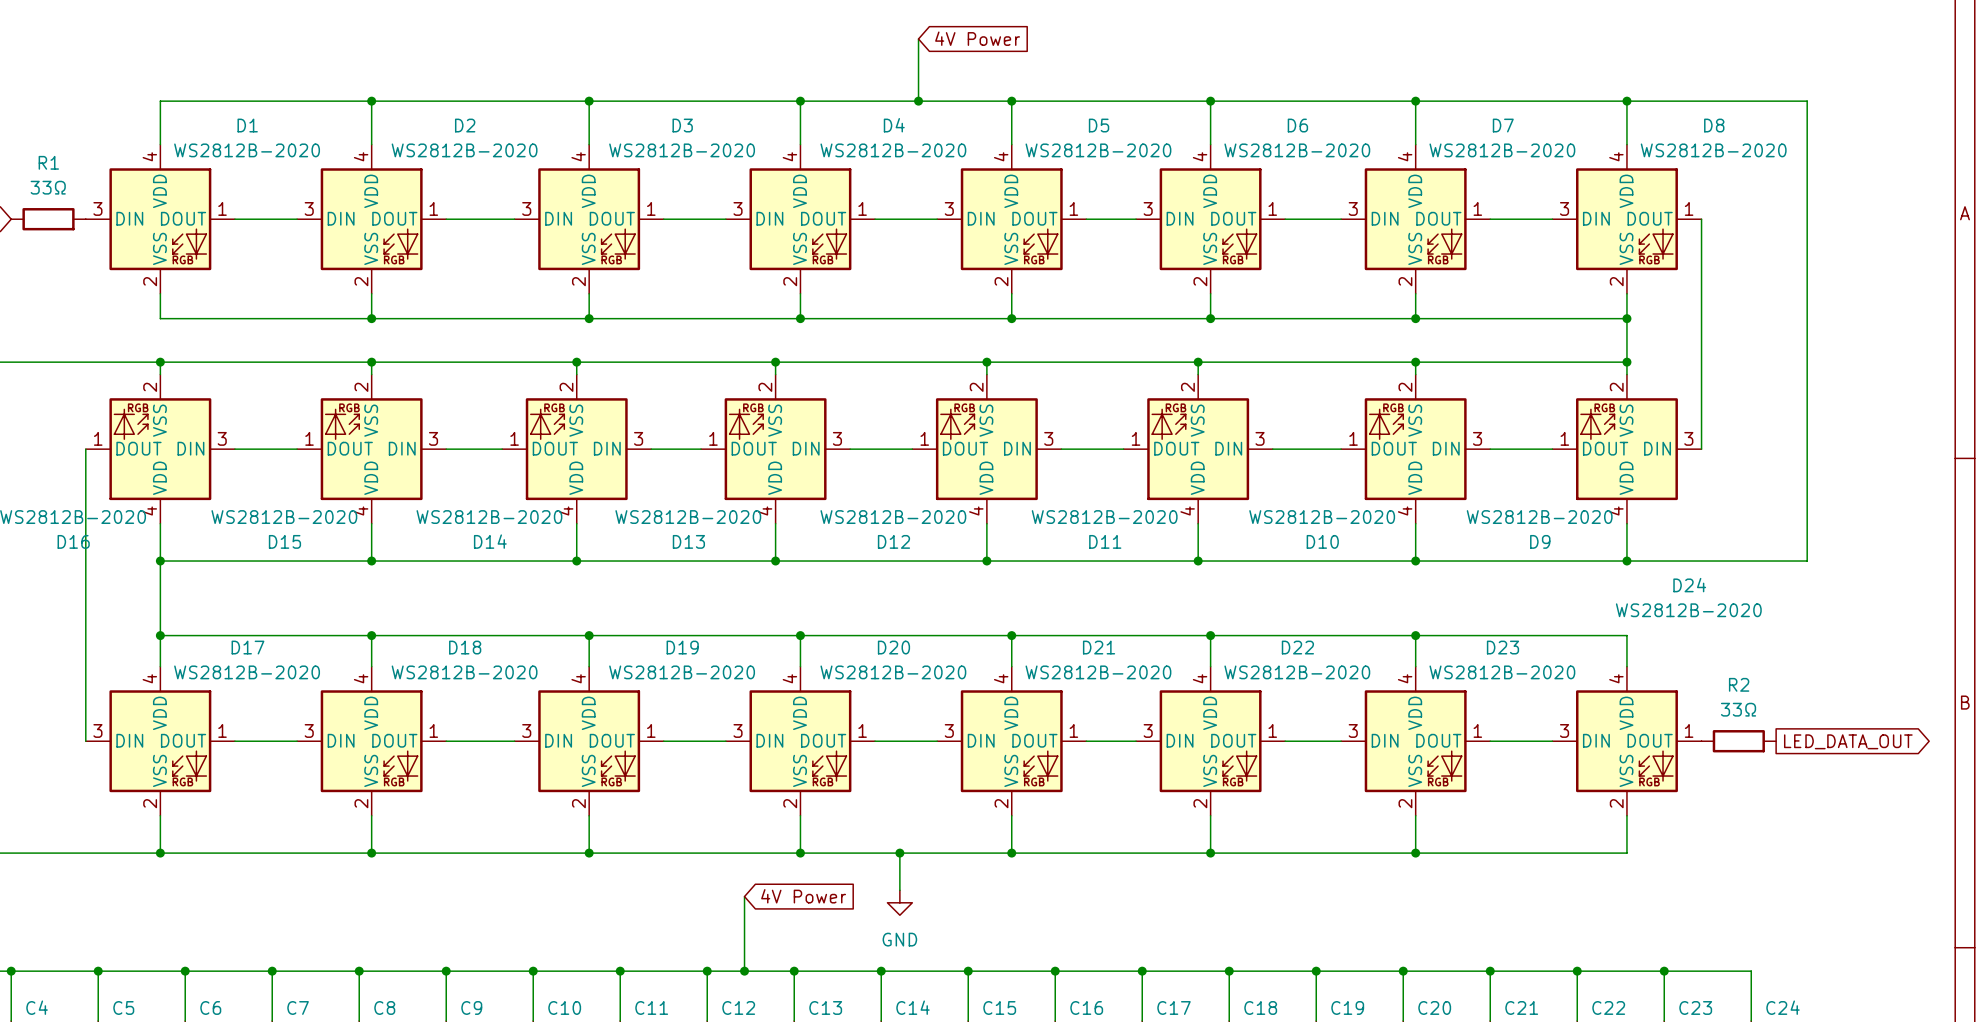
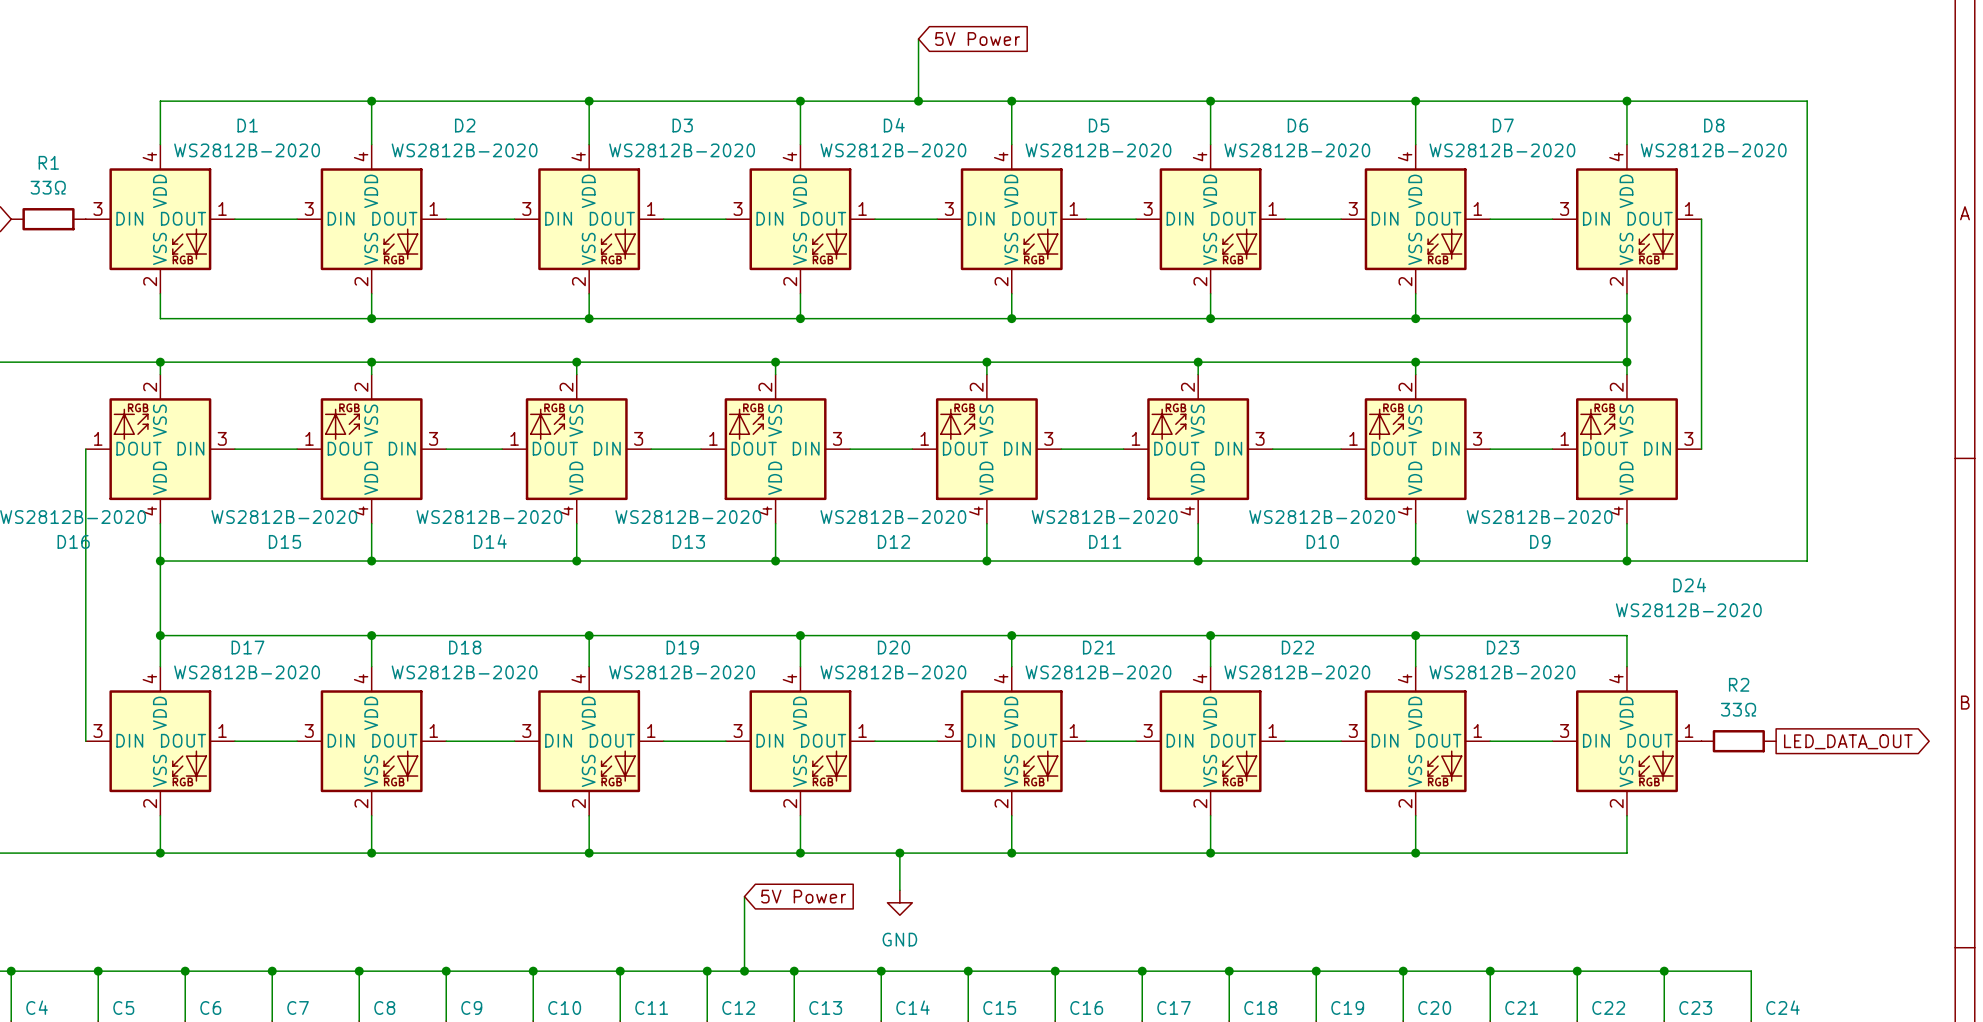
global label: 4V Power (977, 38) -> 5V Power (977, 39)
global label: 4V Power (803, 896) -> 5V Power (803, 896)

